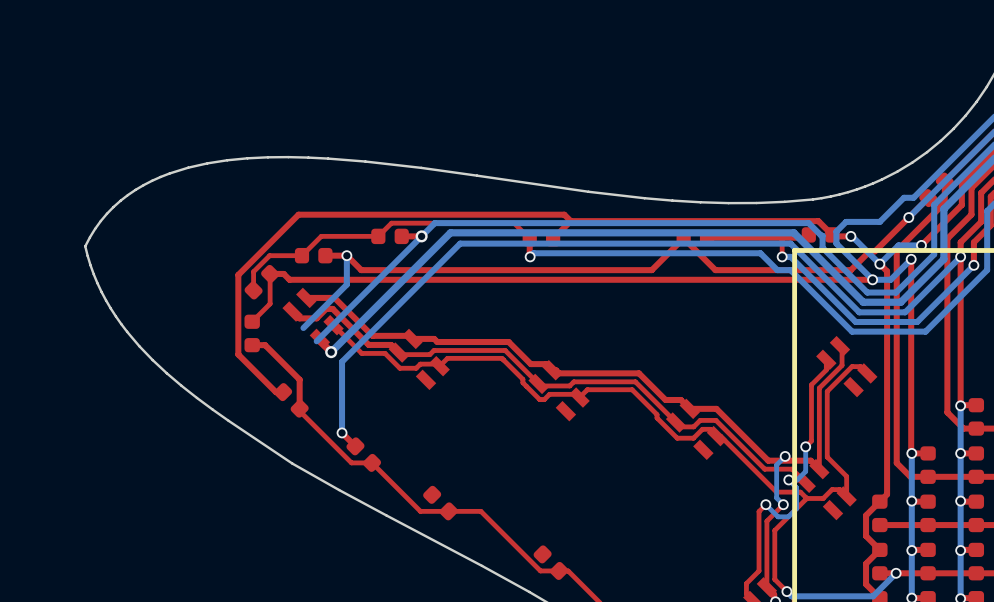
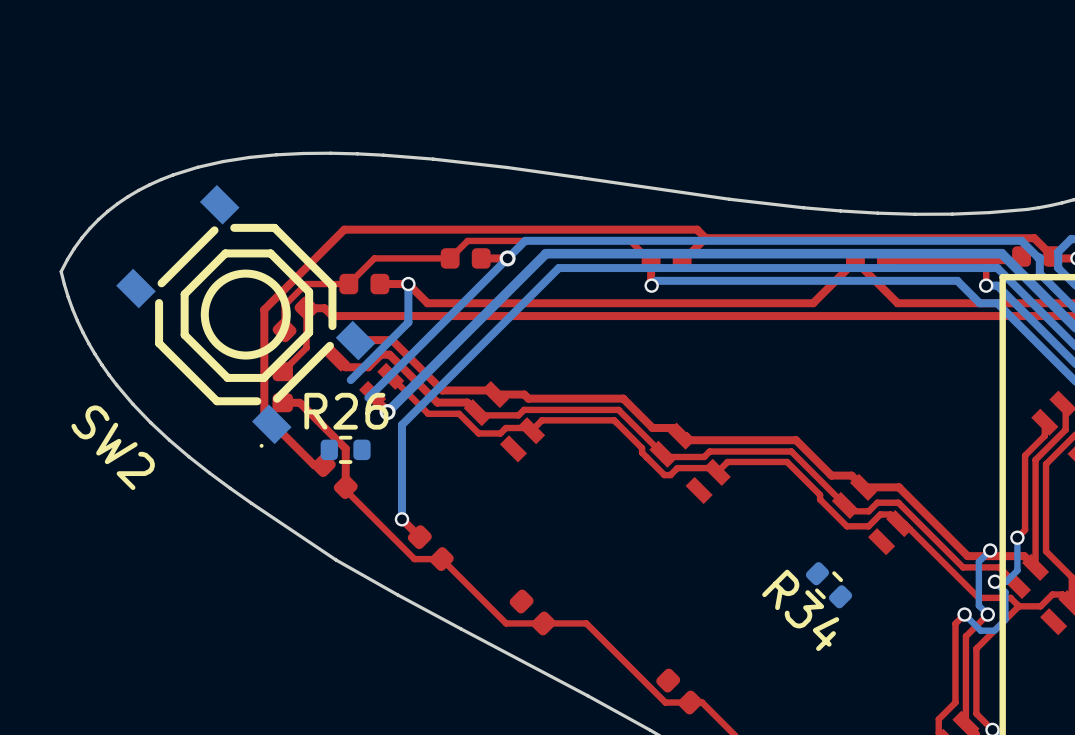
SW2: none -> (245, 316)
R26: none -> (345, 449)
R34: none -> (829, 585)

